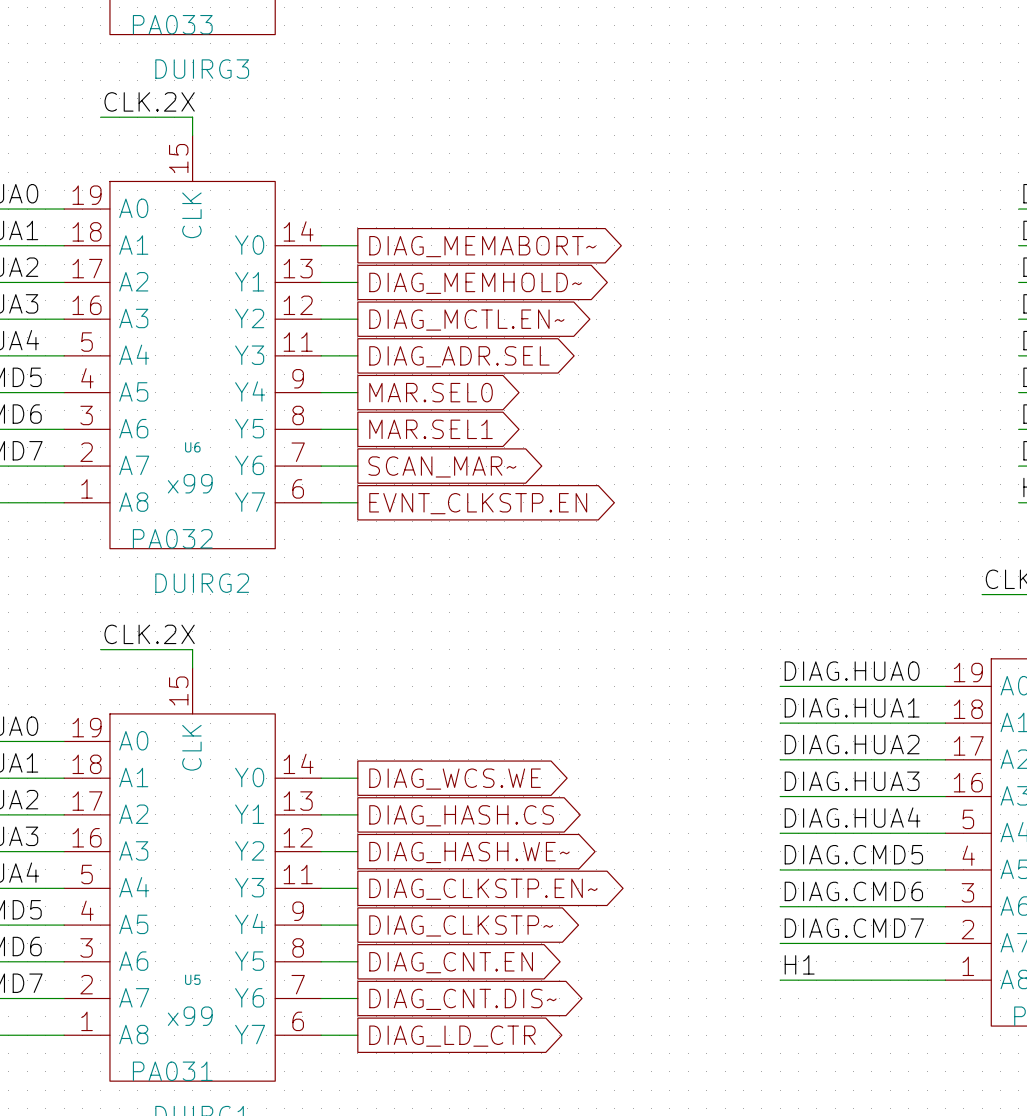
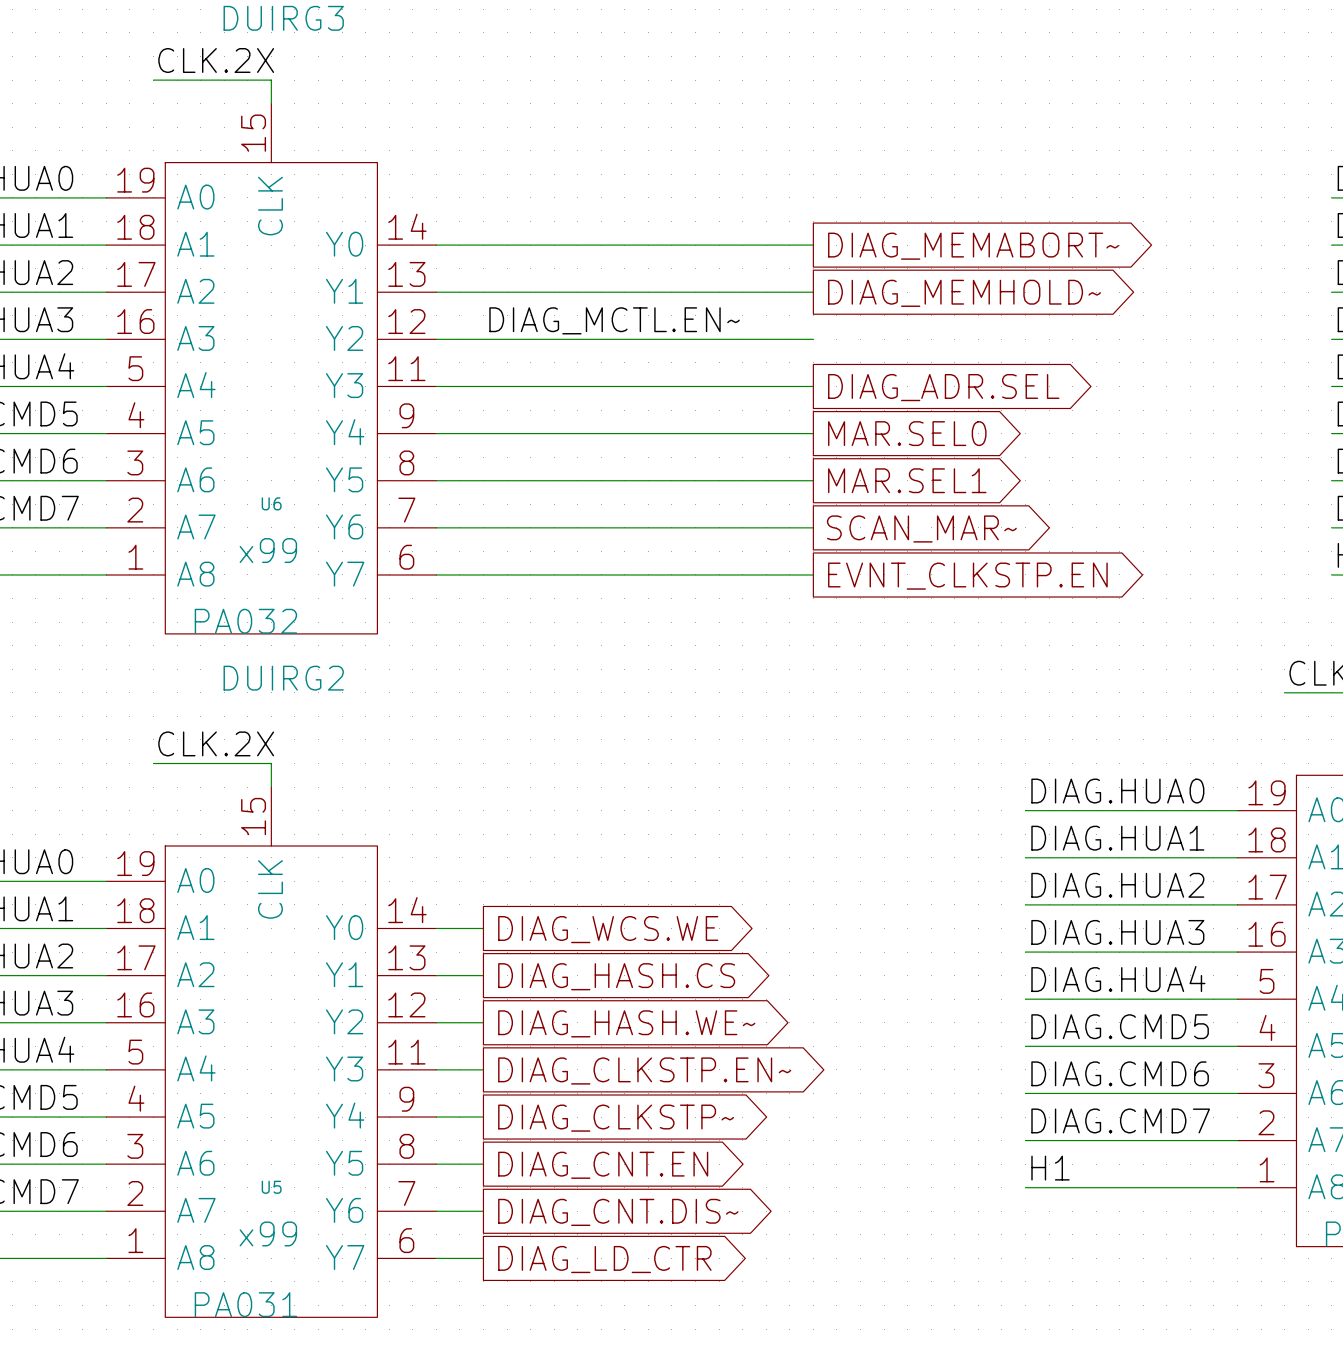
wire: none -> (483, 245) (813, 245)
global label: DIAG_MEMABORT~ (482, 246) -> none
global label: none -> DIAG_MEMABORT~ (973, 246)
wire: none -> (483, 292) (813, 292)
global label: DIAG_MEMHOLD~ (475, 283) -> none
global label: none -> DIAG_MEMHOLD~ (964, 293)
label: none -> DIAG_MCTL.EN~ (614, 320)
wire: none -> (483, 339) (813, 339)
global label: DIAG_MCTL.EN~ (466, 320) -> none
wire: none -> (483, 386) (813, 386)
global label: DIAG_ADR.SEL (459, 356) -> none
global label: none -> DIAG_ADR.SEL (943, 387)
wire: none -> (483, 433) (813, 433)
global label: MAR.SEL0 (431, 392) -> none
global label: none -> MAR.SEL0 (907, 433)
wire: none -> (483, 480) (813, 480)
global label: MAR.SEL1 (431, 429) -> none
global label: none -> MAR.SEL1 (907, 480)
wire: none -> (483, 527) (813, 527)
global label: SCAN_MAR~ (442, 466) -> none
global label: none -> SCAN_MAR~ (921, 528)
wire: none -> (483, 574) (813, 574)
global label: EVNT_CLKSTP.EN (478, 503) -> none
global label: none -> EVNT_CLKSTP.EN (967, 576)

